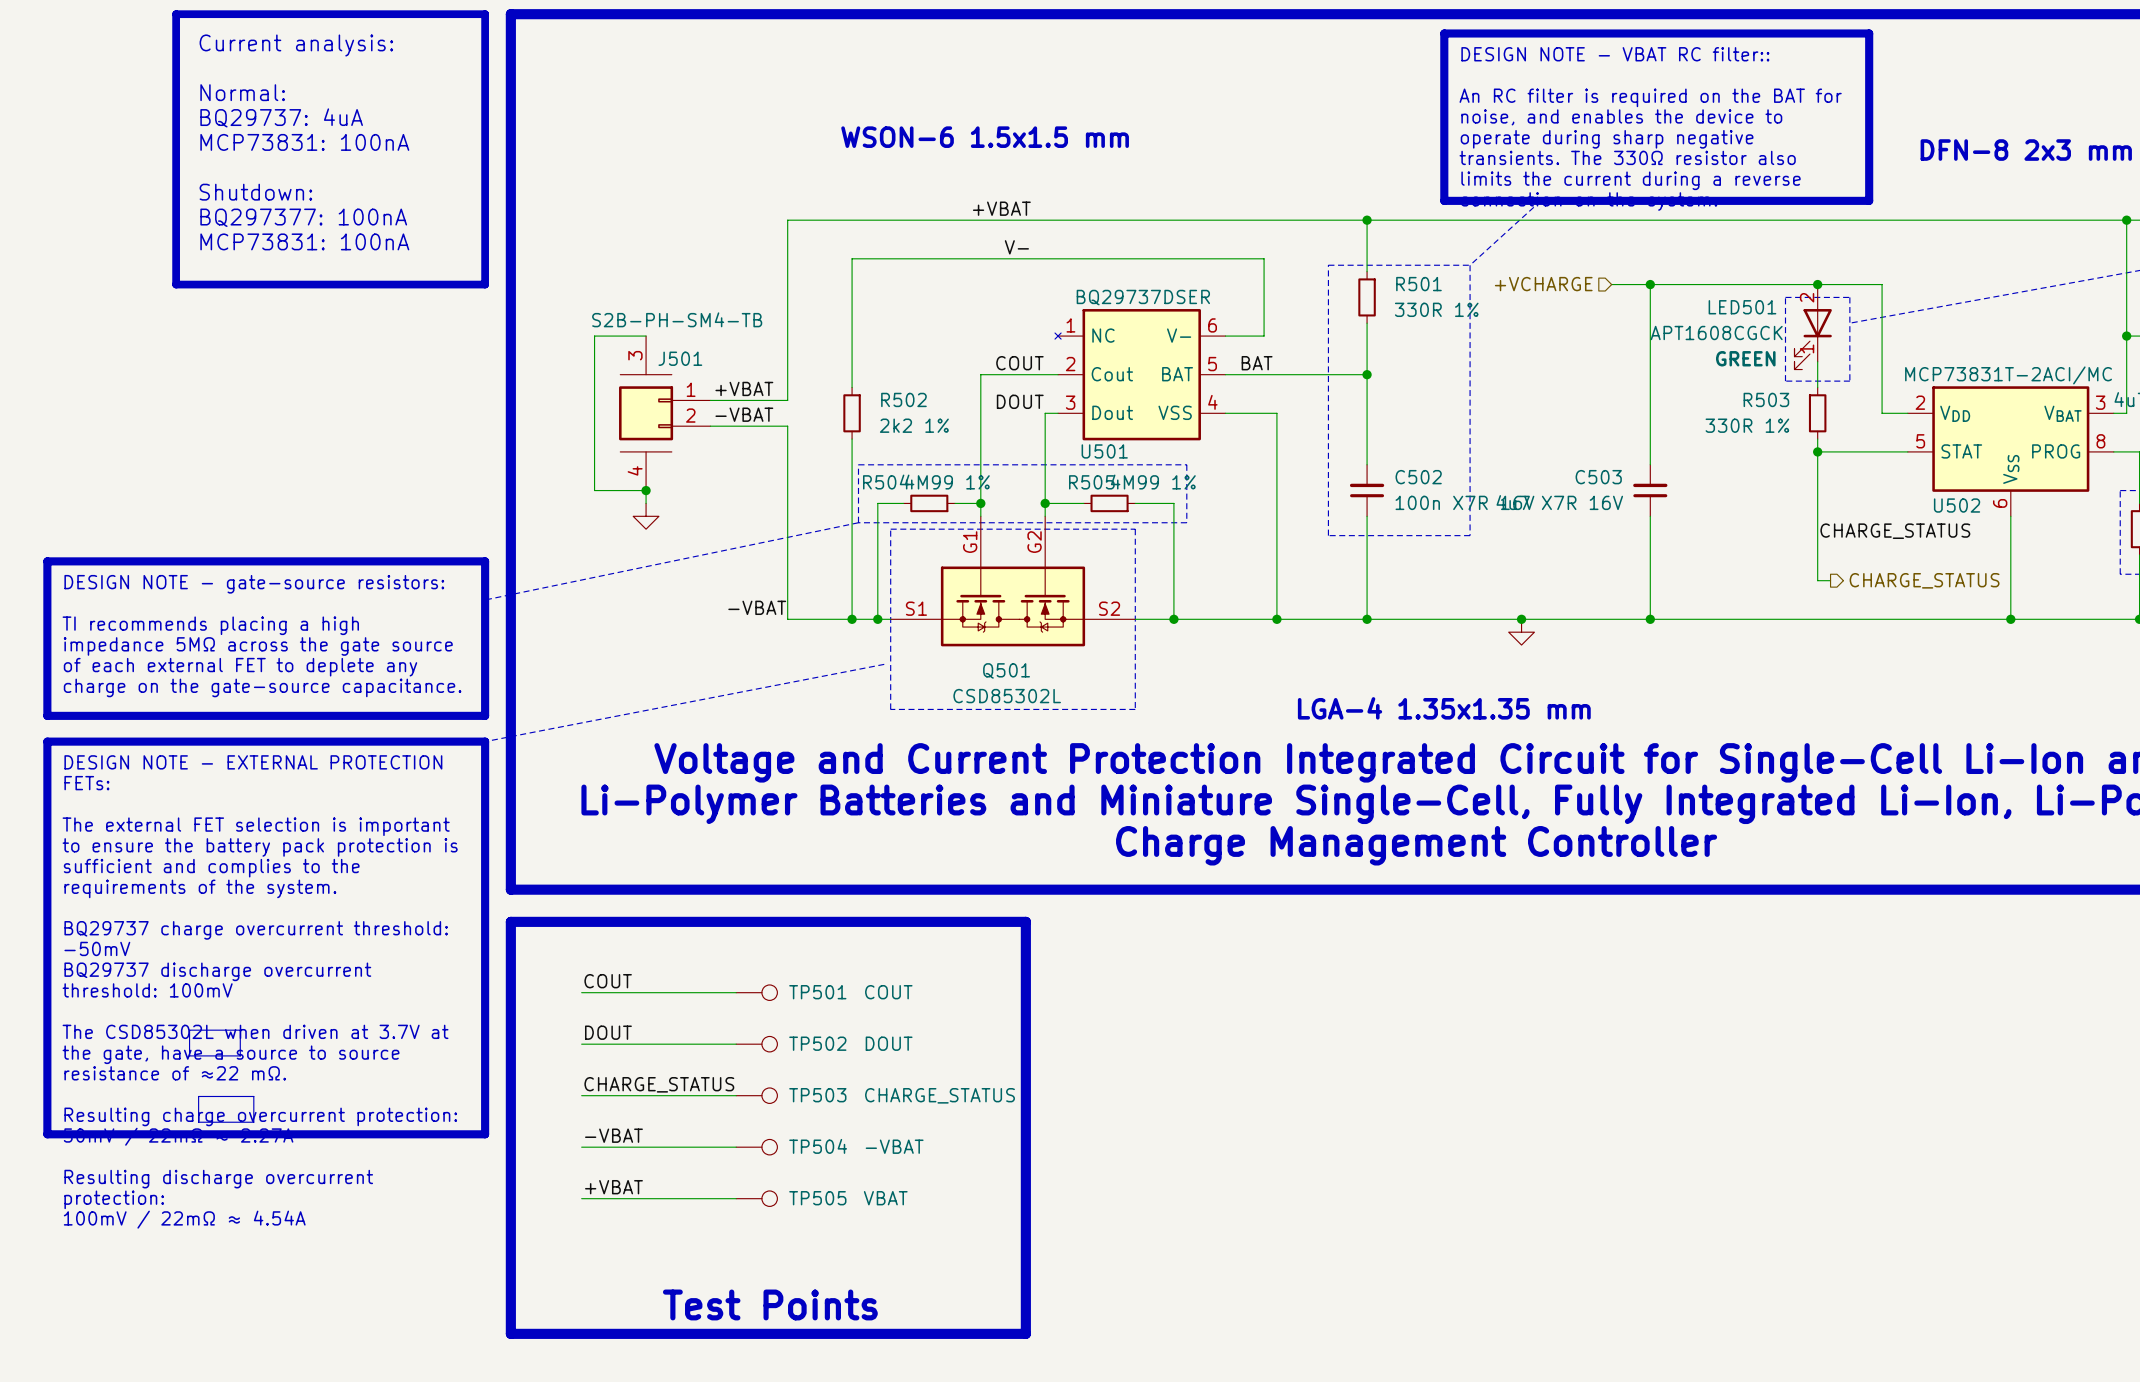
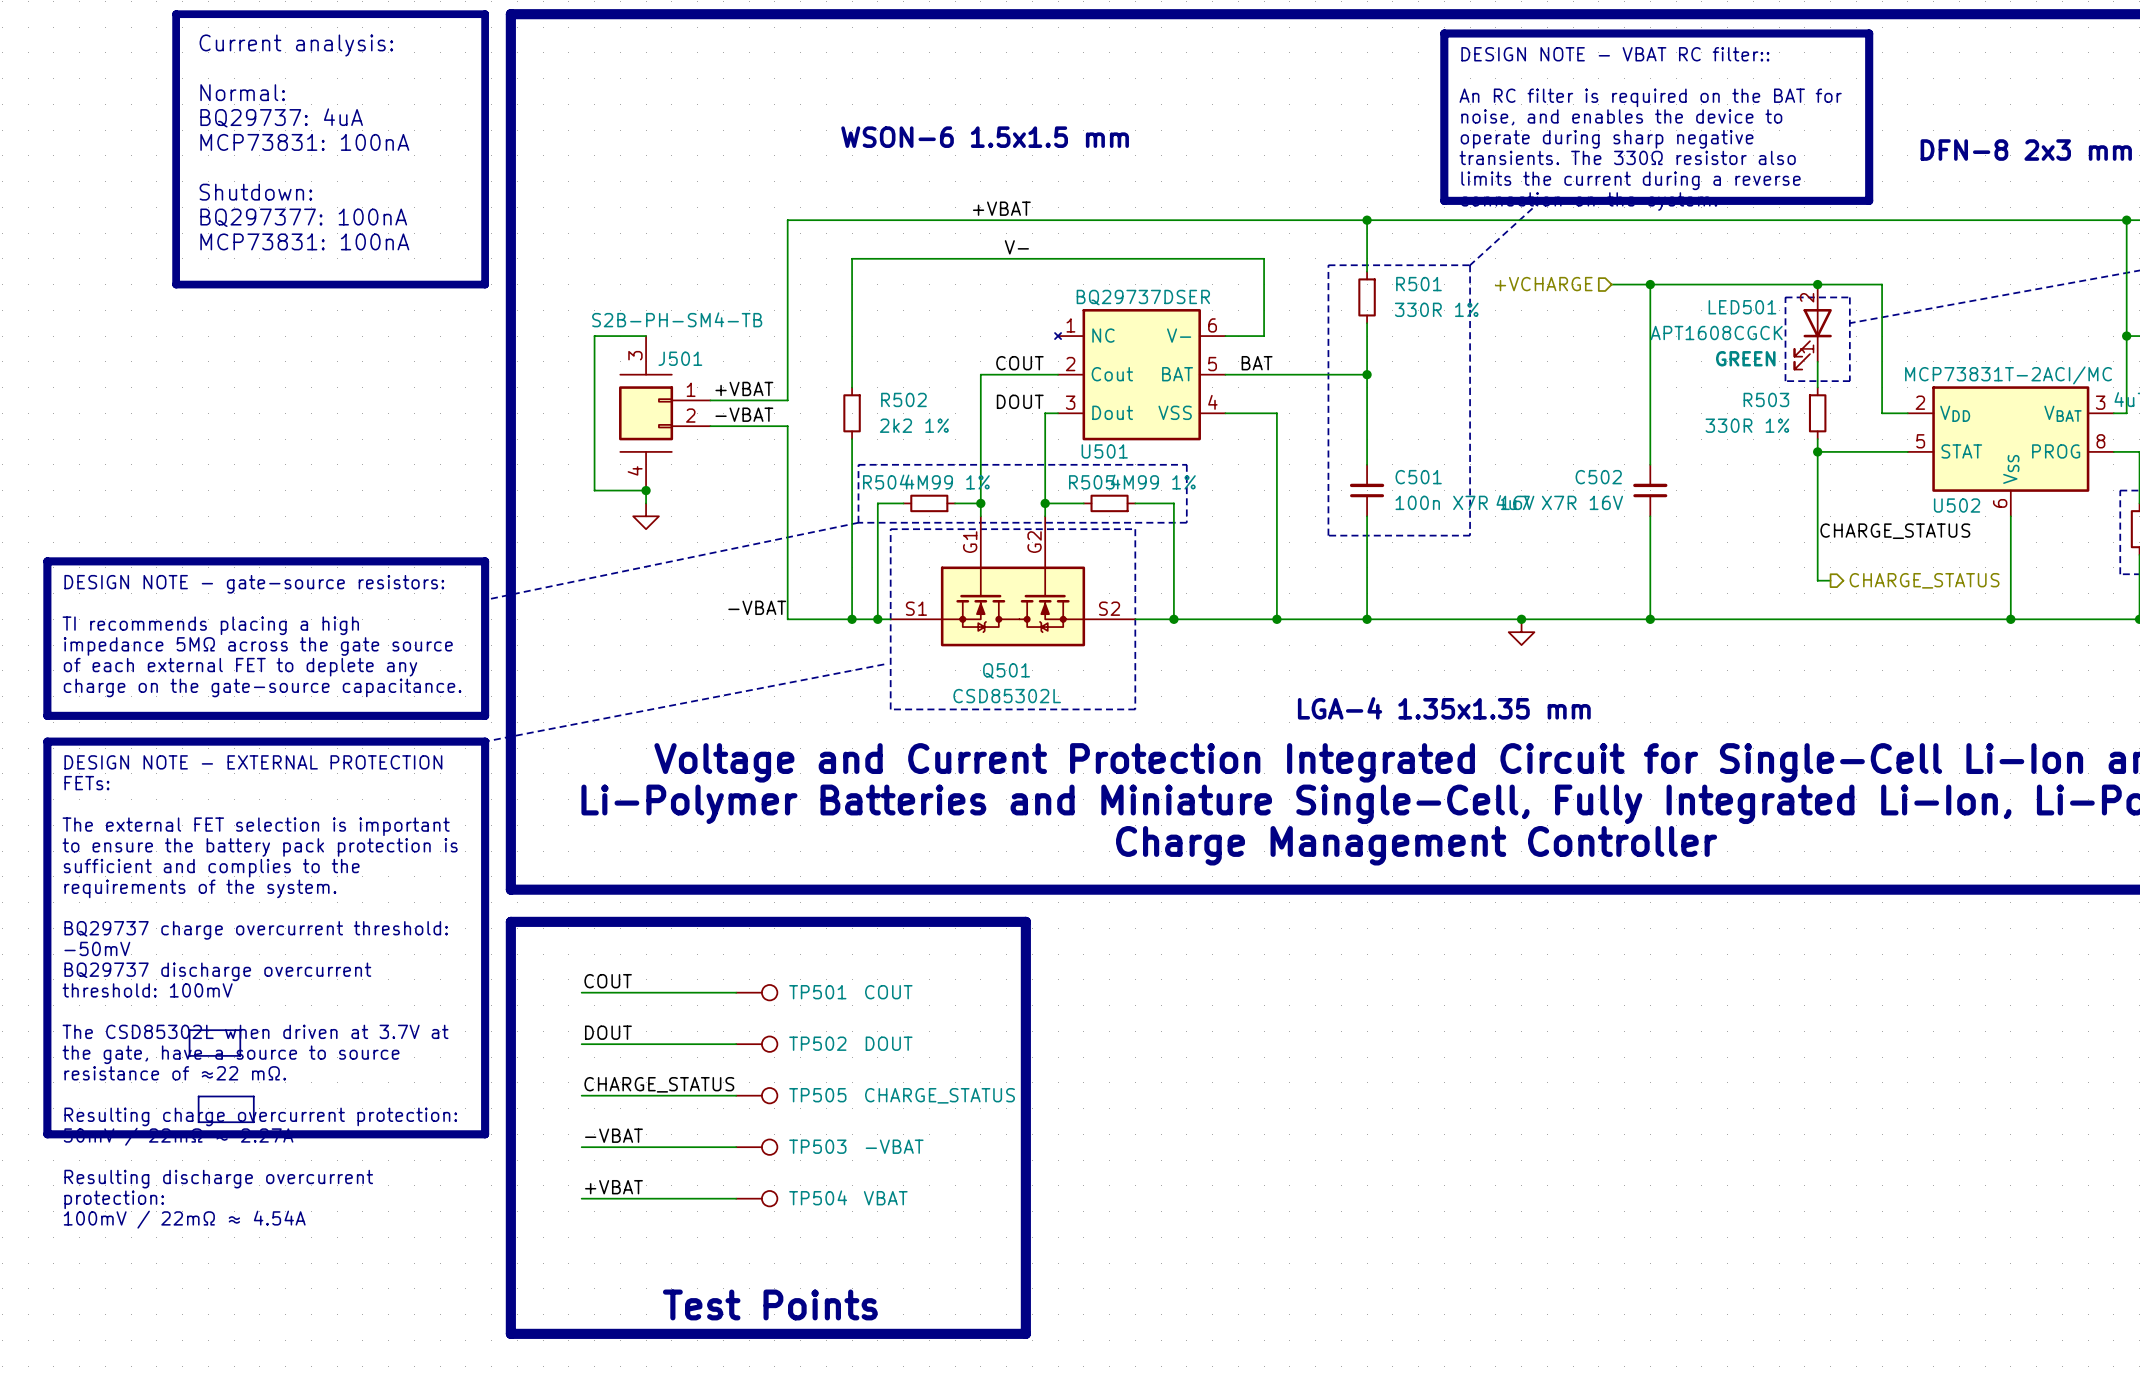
C502 name: C502 (1418, 477) -> C501 (1418, 477)
C503 name: C503 (1598, 477) -> C502 (1598, 477)
TP503 name: TP503 (817, 1095) -> TP505 (817, 1095)
TP504 name: TP504 (818, 1146) -> TP503 (817, 1146)
TP505 name: TP505 (817, 1198) -> TP504 (818, 1197)

